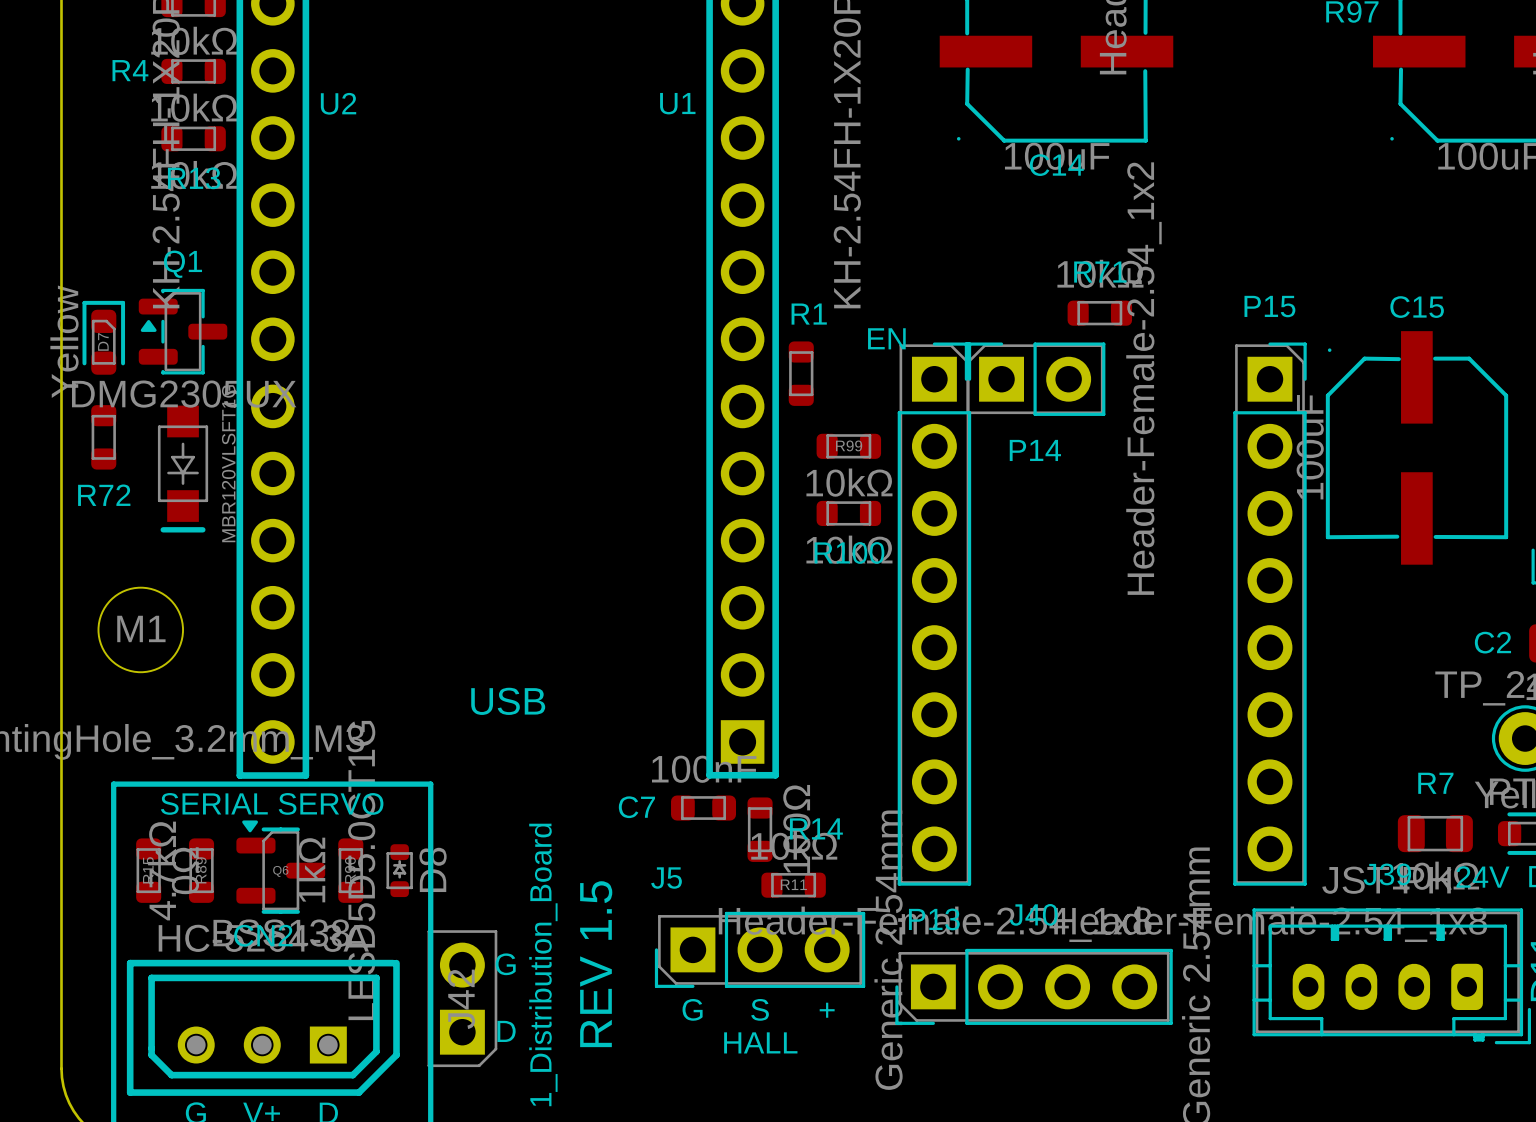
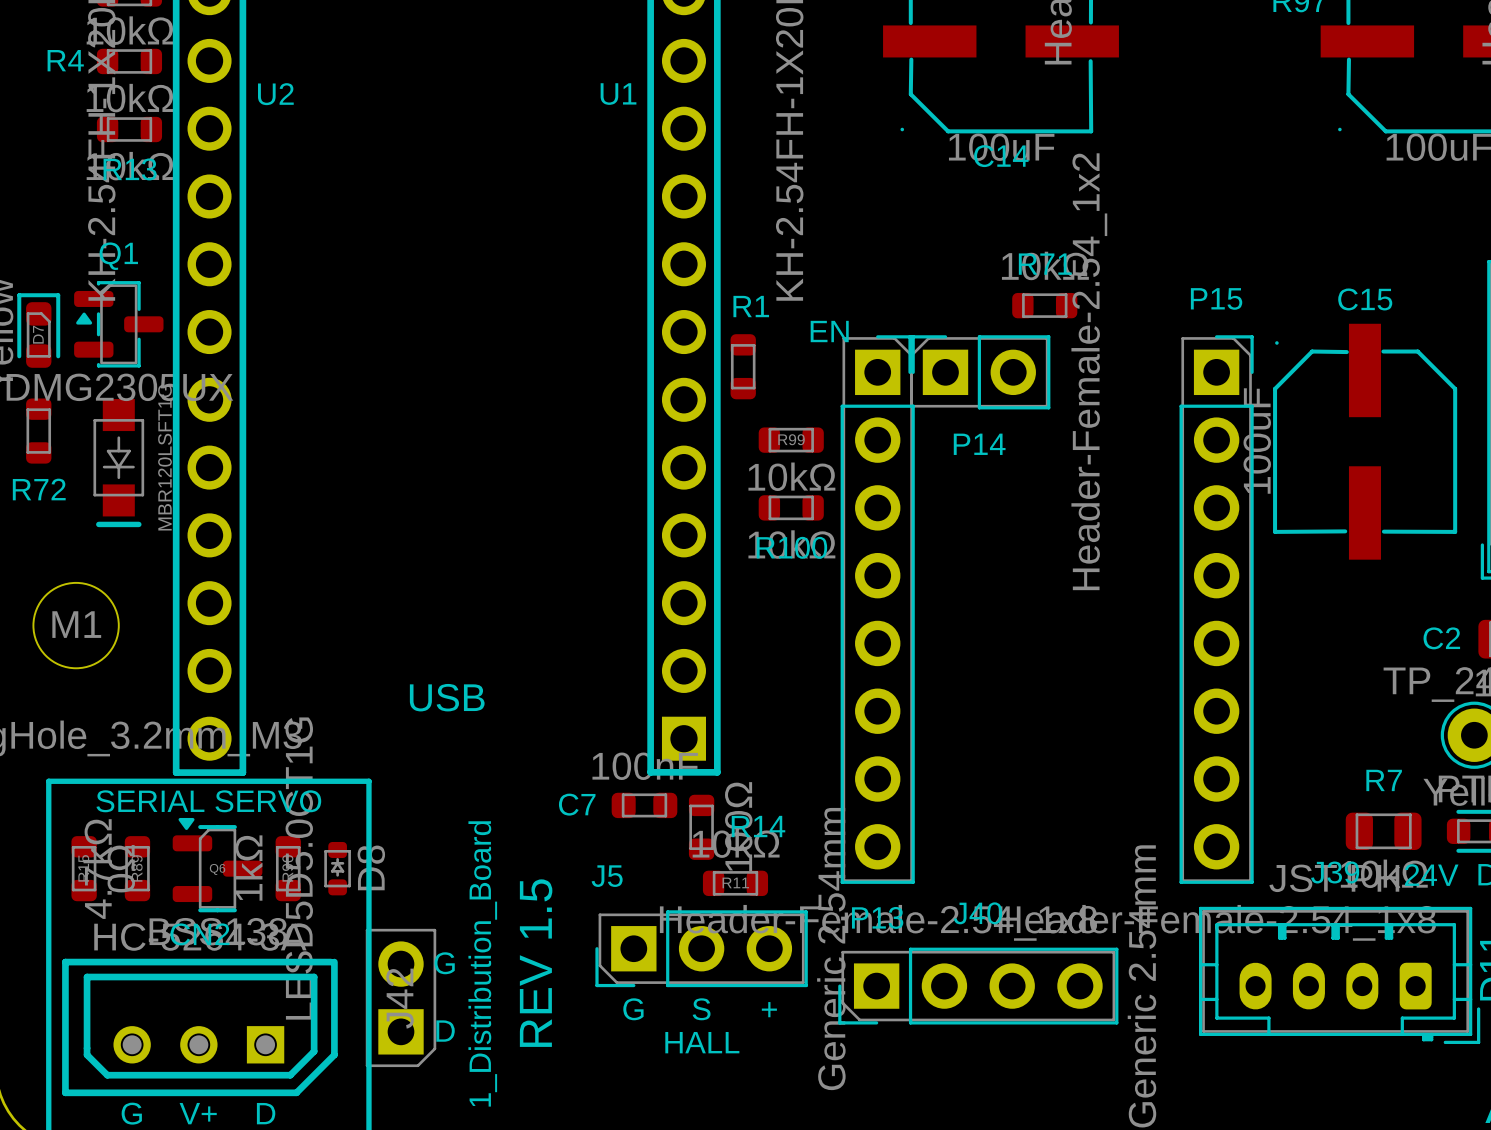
part value: MBR120VLSFT1G (228, 463) -> MBR120LSFT1G (165, 457)

